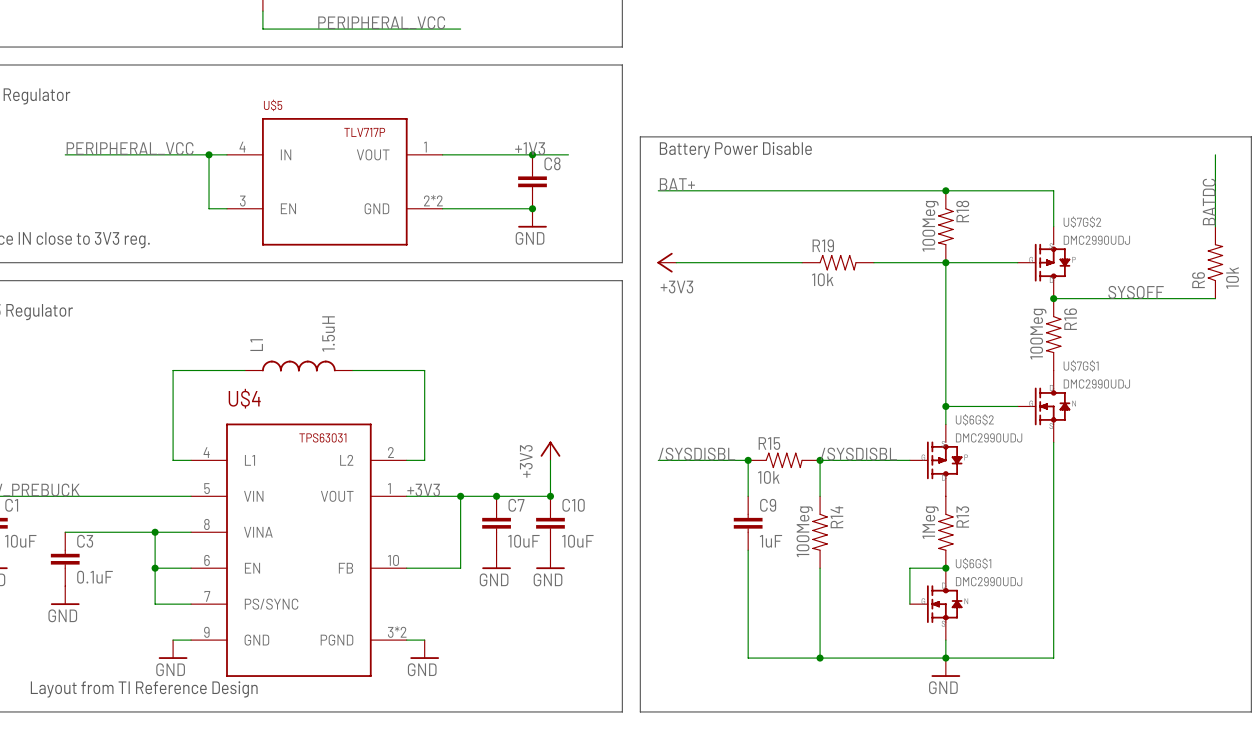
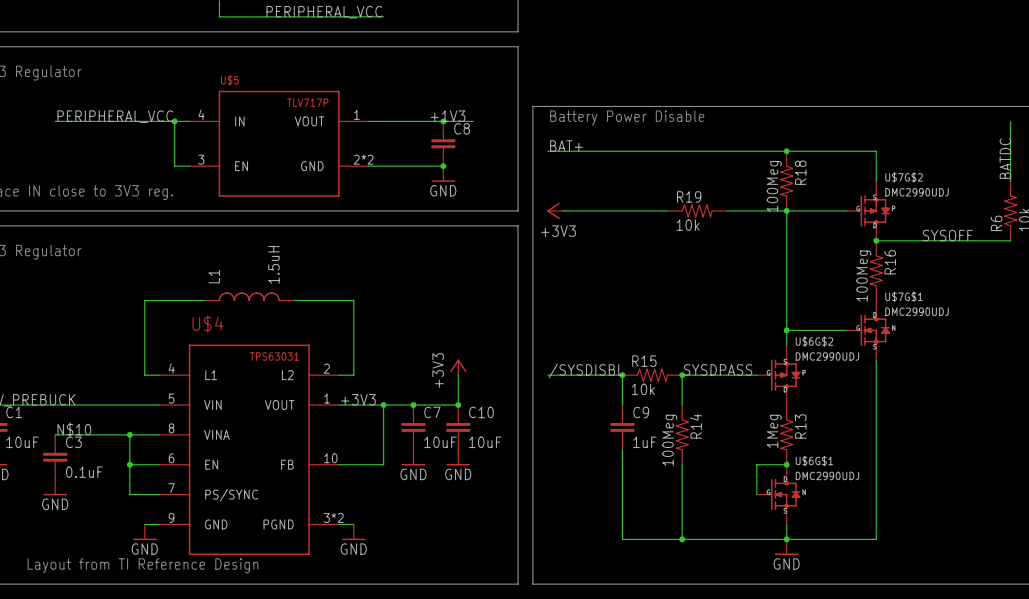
label: /SYSDISBL (858, 454) -> SYSDPASS (718, 369)
label: none -> N$10 (74, 429)

